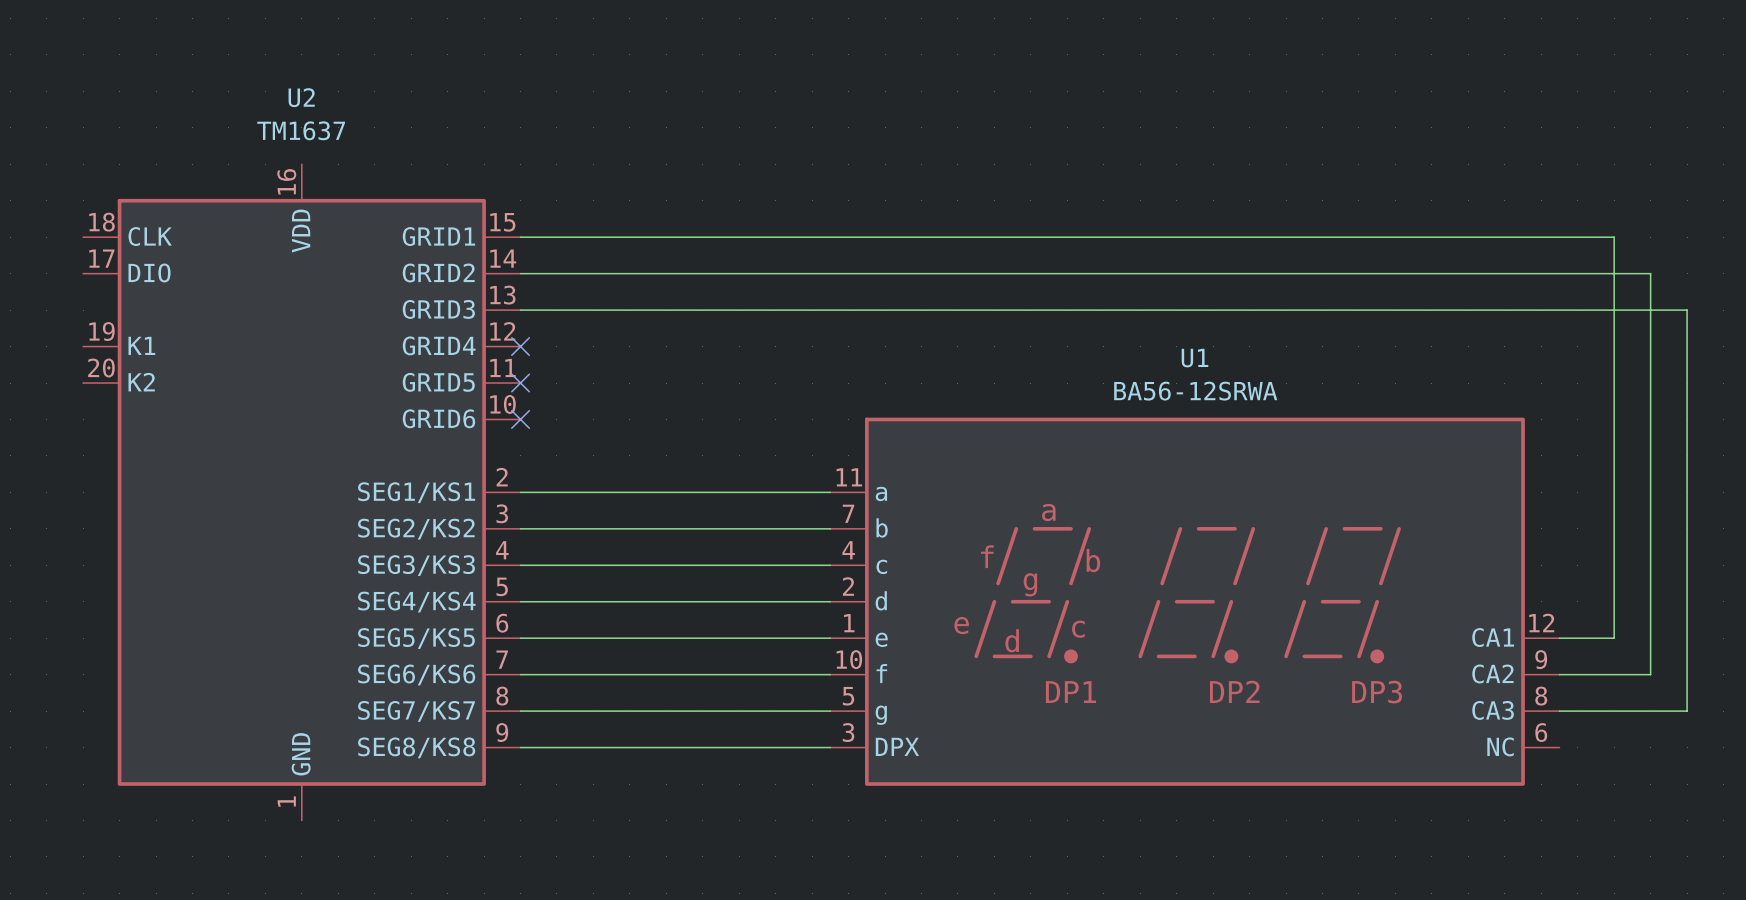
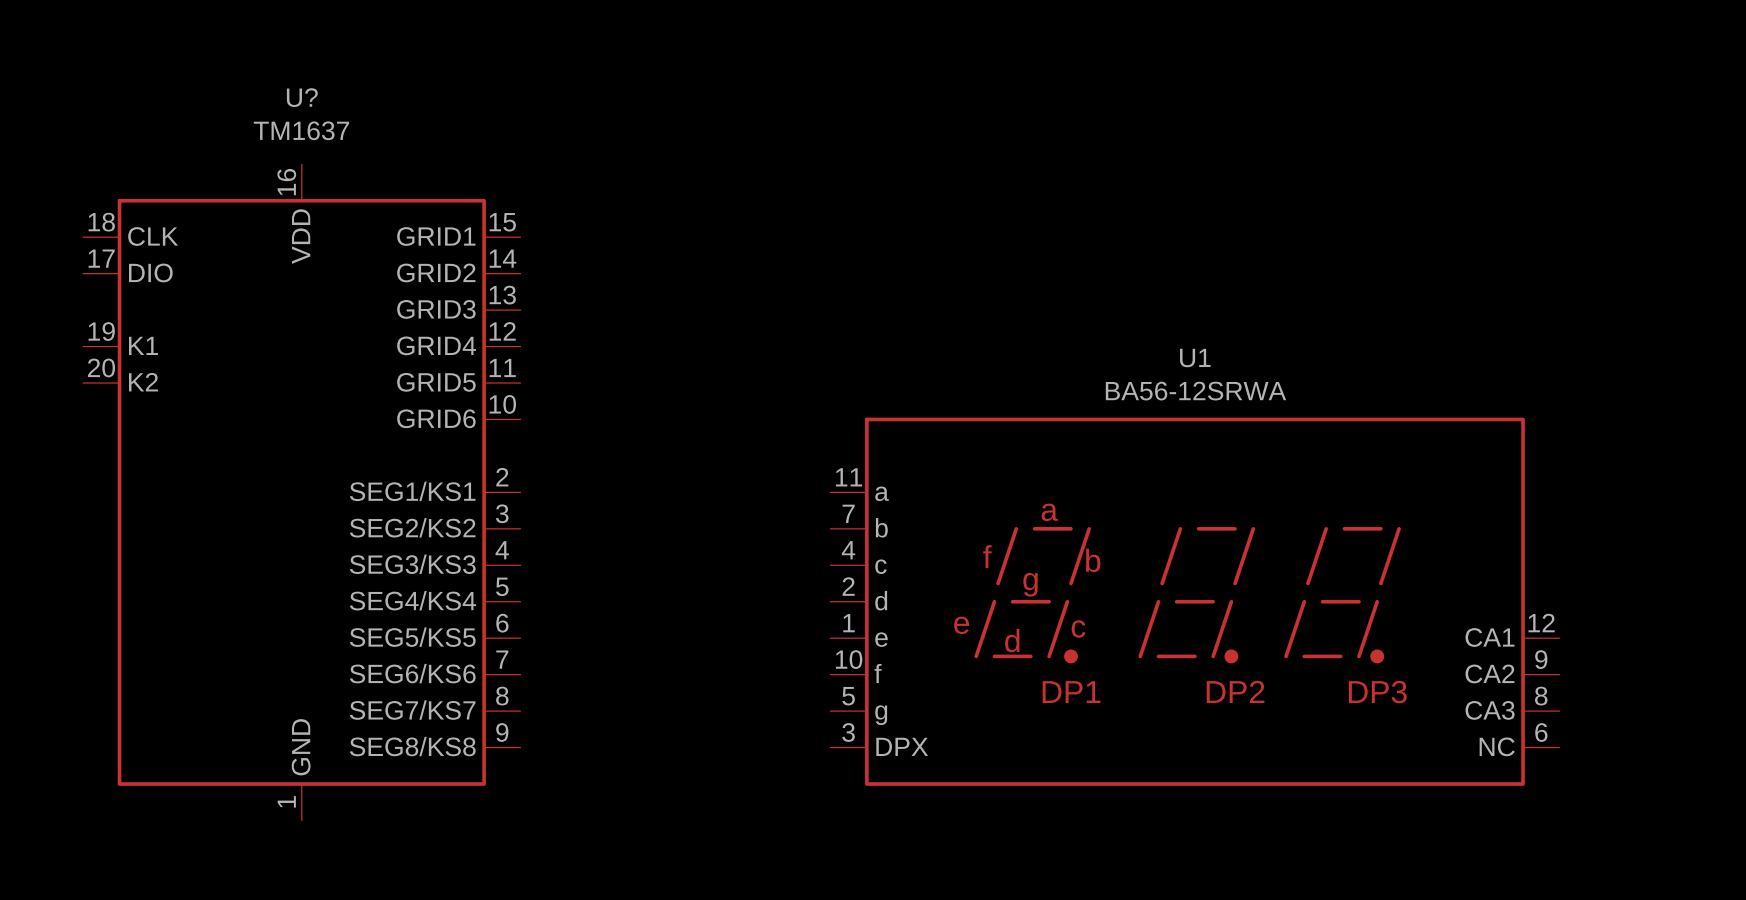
U2 name: U2 (301, 97) -> U? (302, 97)
wire: (520, 237) (1614, 237) (1614, 638) (1559, 638) -> none
wire: (520, 273) (1650, 273) (1650, 674) (1559, 674) -> none
wire: (520, 310) (1687, 310) (1687, 711) (1559, 711) -> none
no-connect mark: (520, 346) -> none
no-connect mark: (520, 383) -> none
no-connect mark: (520, 419) -> none
wire: (520, 492) (830, 492) -> none
wire: (520, 528) (830, 528) -> none
wire: (520, 565) (830, 565) -> none
wire: (520, 601) (830, 601) -> none
wire: (520, 638) (830, 638) -> none
wire: (520, 674) (830, 674) -> none
wire: (520, 711) (830, 711) -> none
wire: (520, 747) (830, 747) -> none

